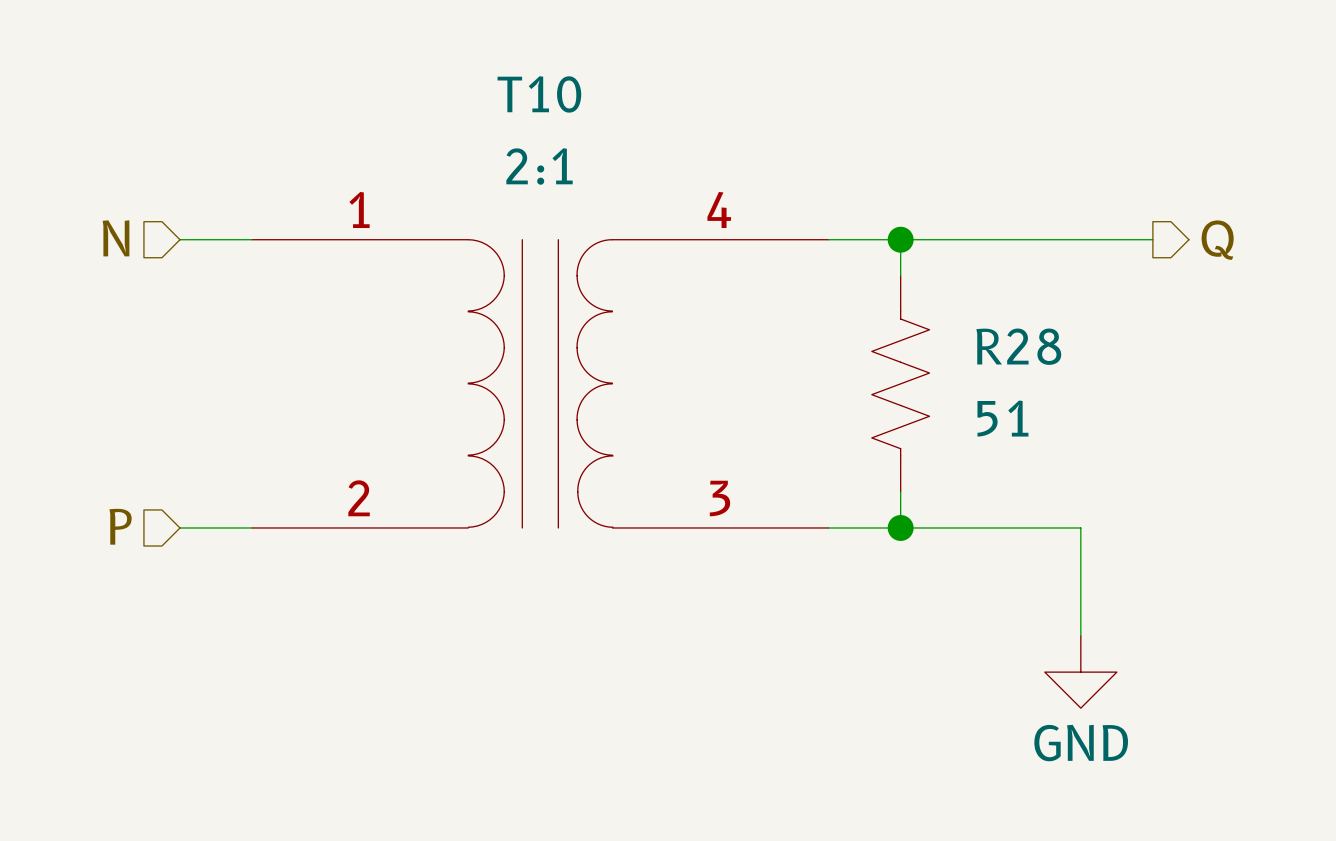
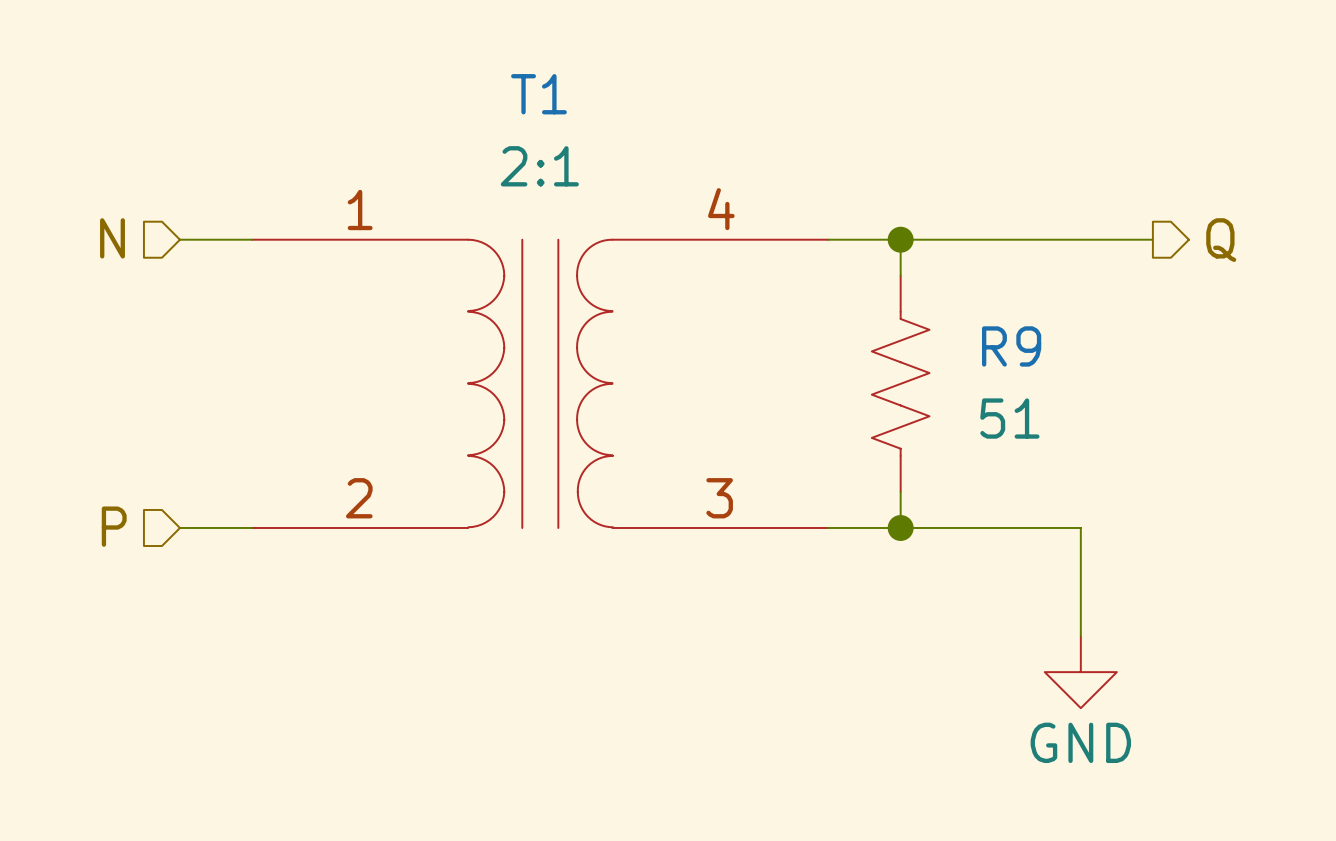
T10 name: T10 (539, 94) -> T1 (538, 94)
R28 name: R28 (1018, 346) -> R9 (1011, 346)

